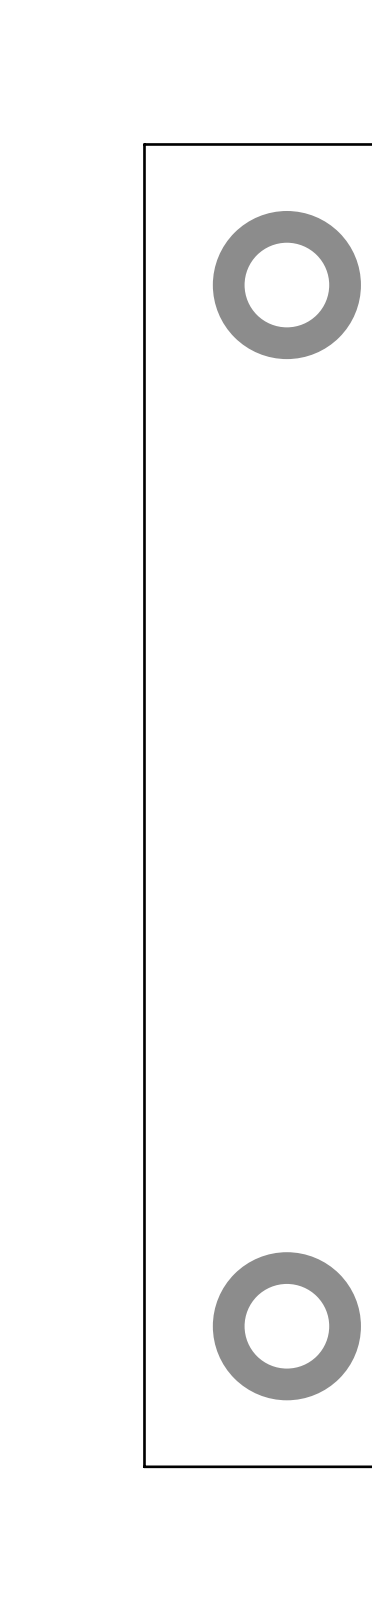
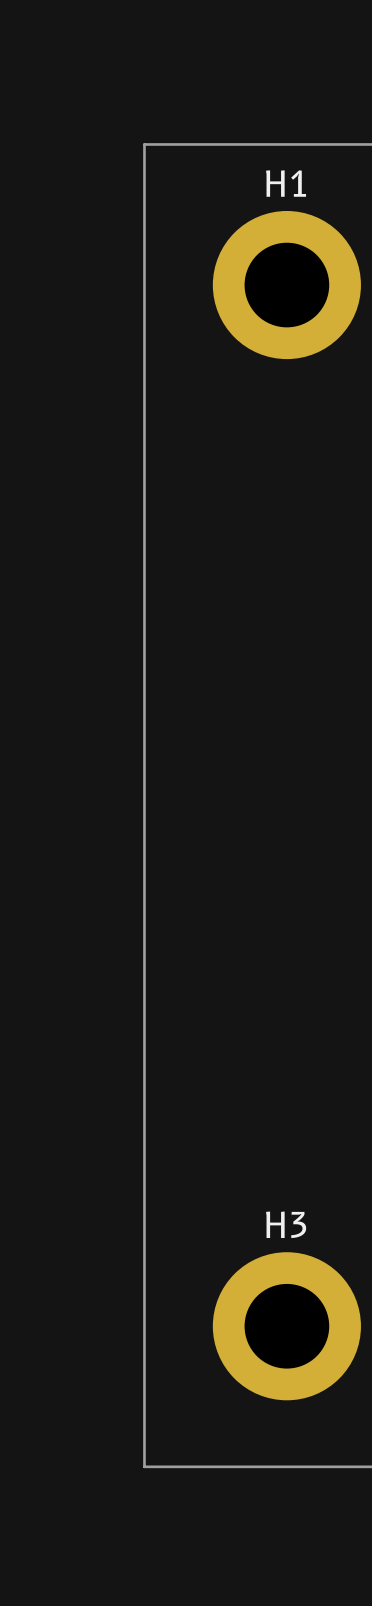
H1 name: none -> H1 (286, 183)
H3 name: none -> H3 (286, 1224)

